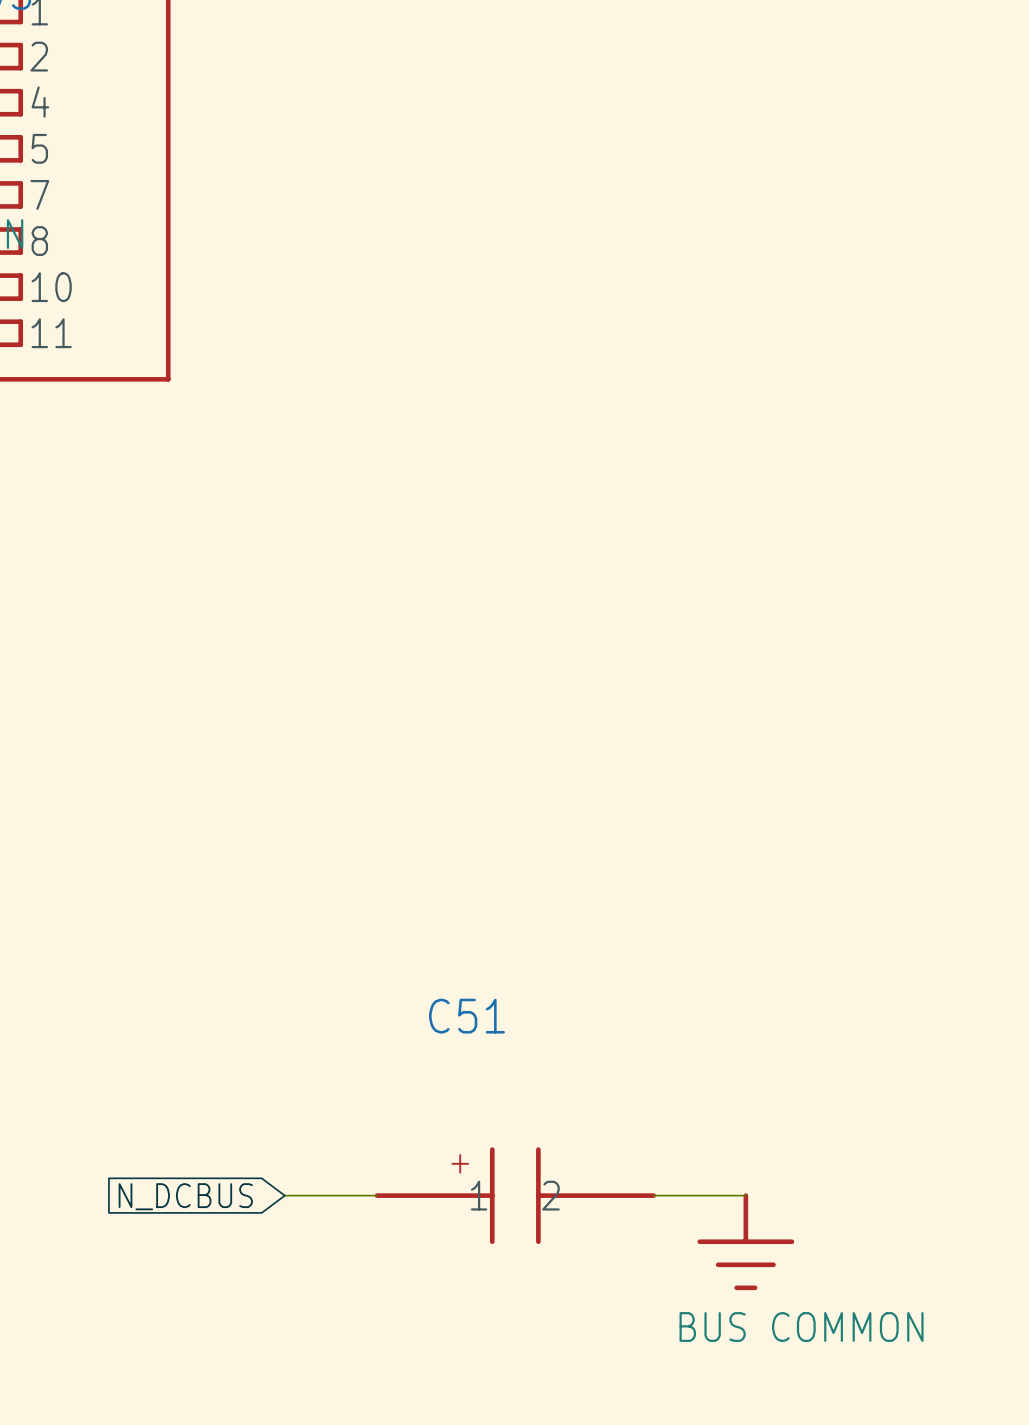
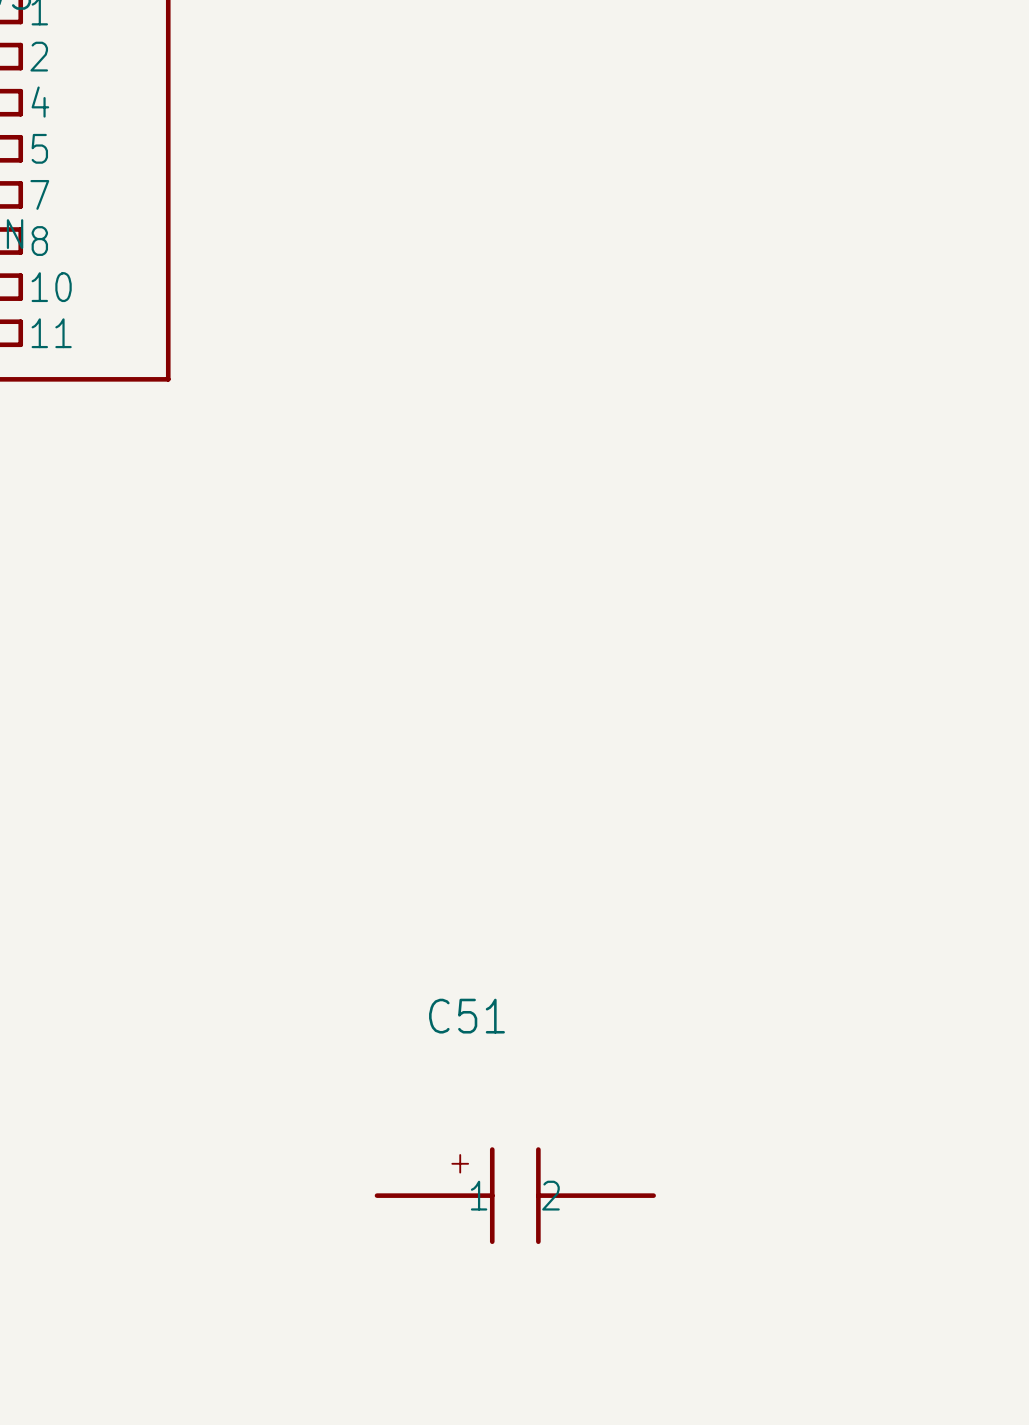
wire: (284, 1195) (377, 1195) -> none
wire: (653, 1195) (745, 1195) -> none
global label: N_DCBUS (185, 1196) -> none
power symbol: (745, 1241) -> none

